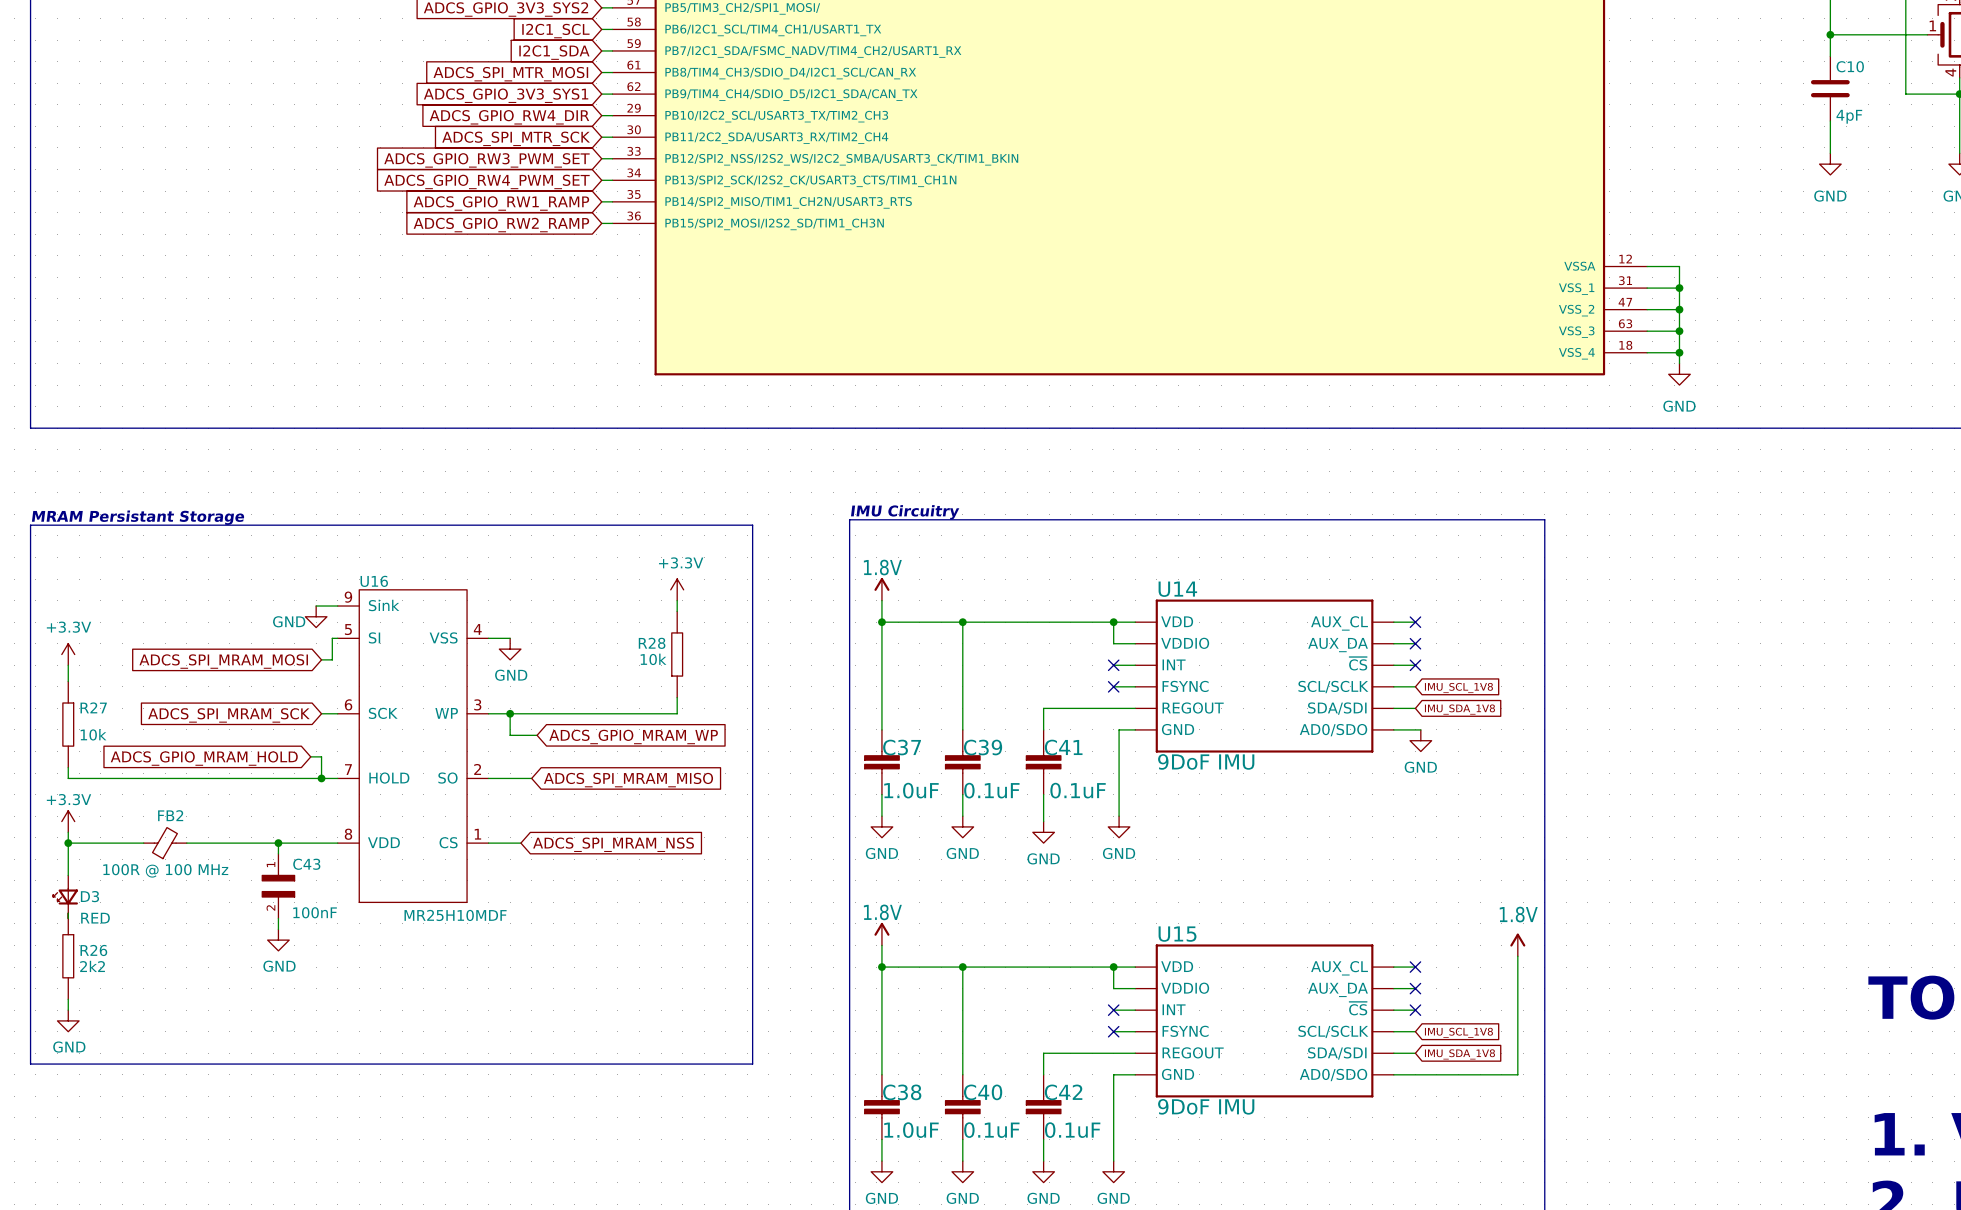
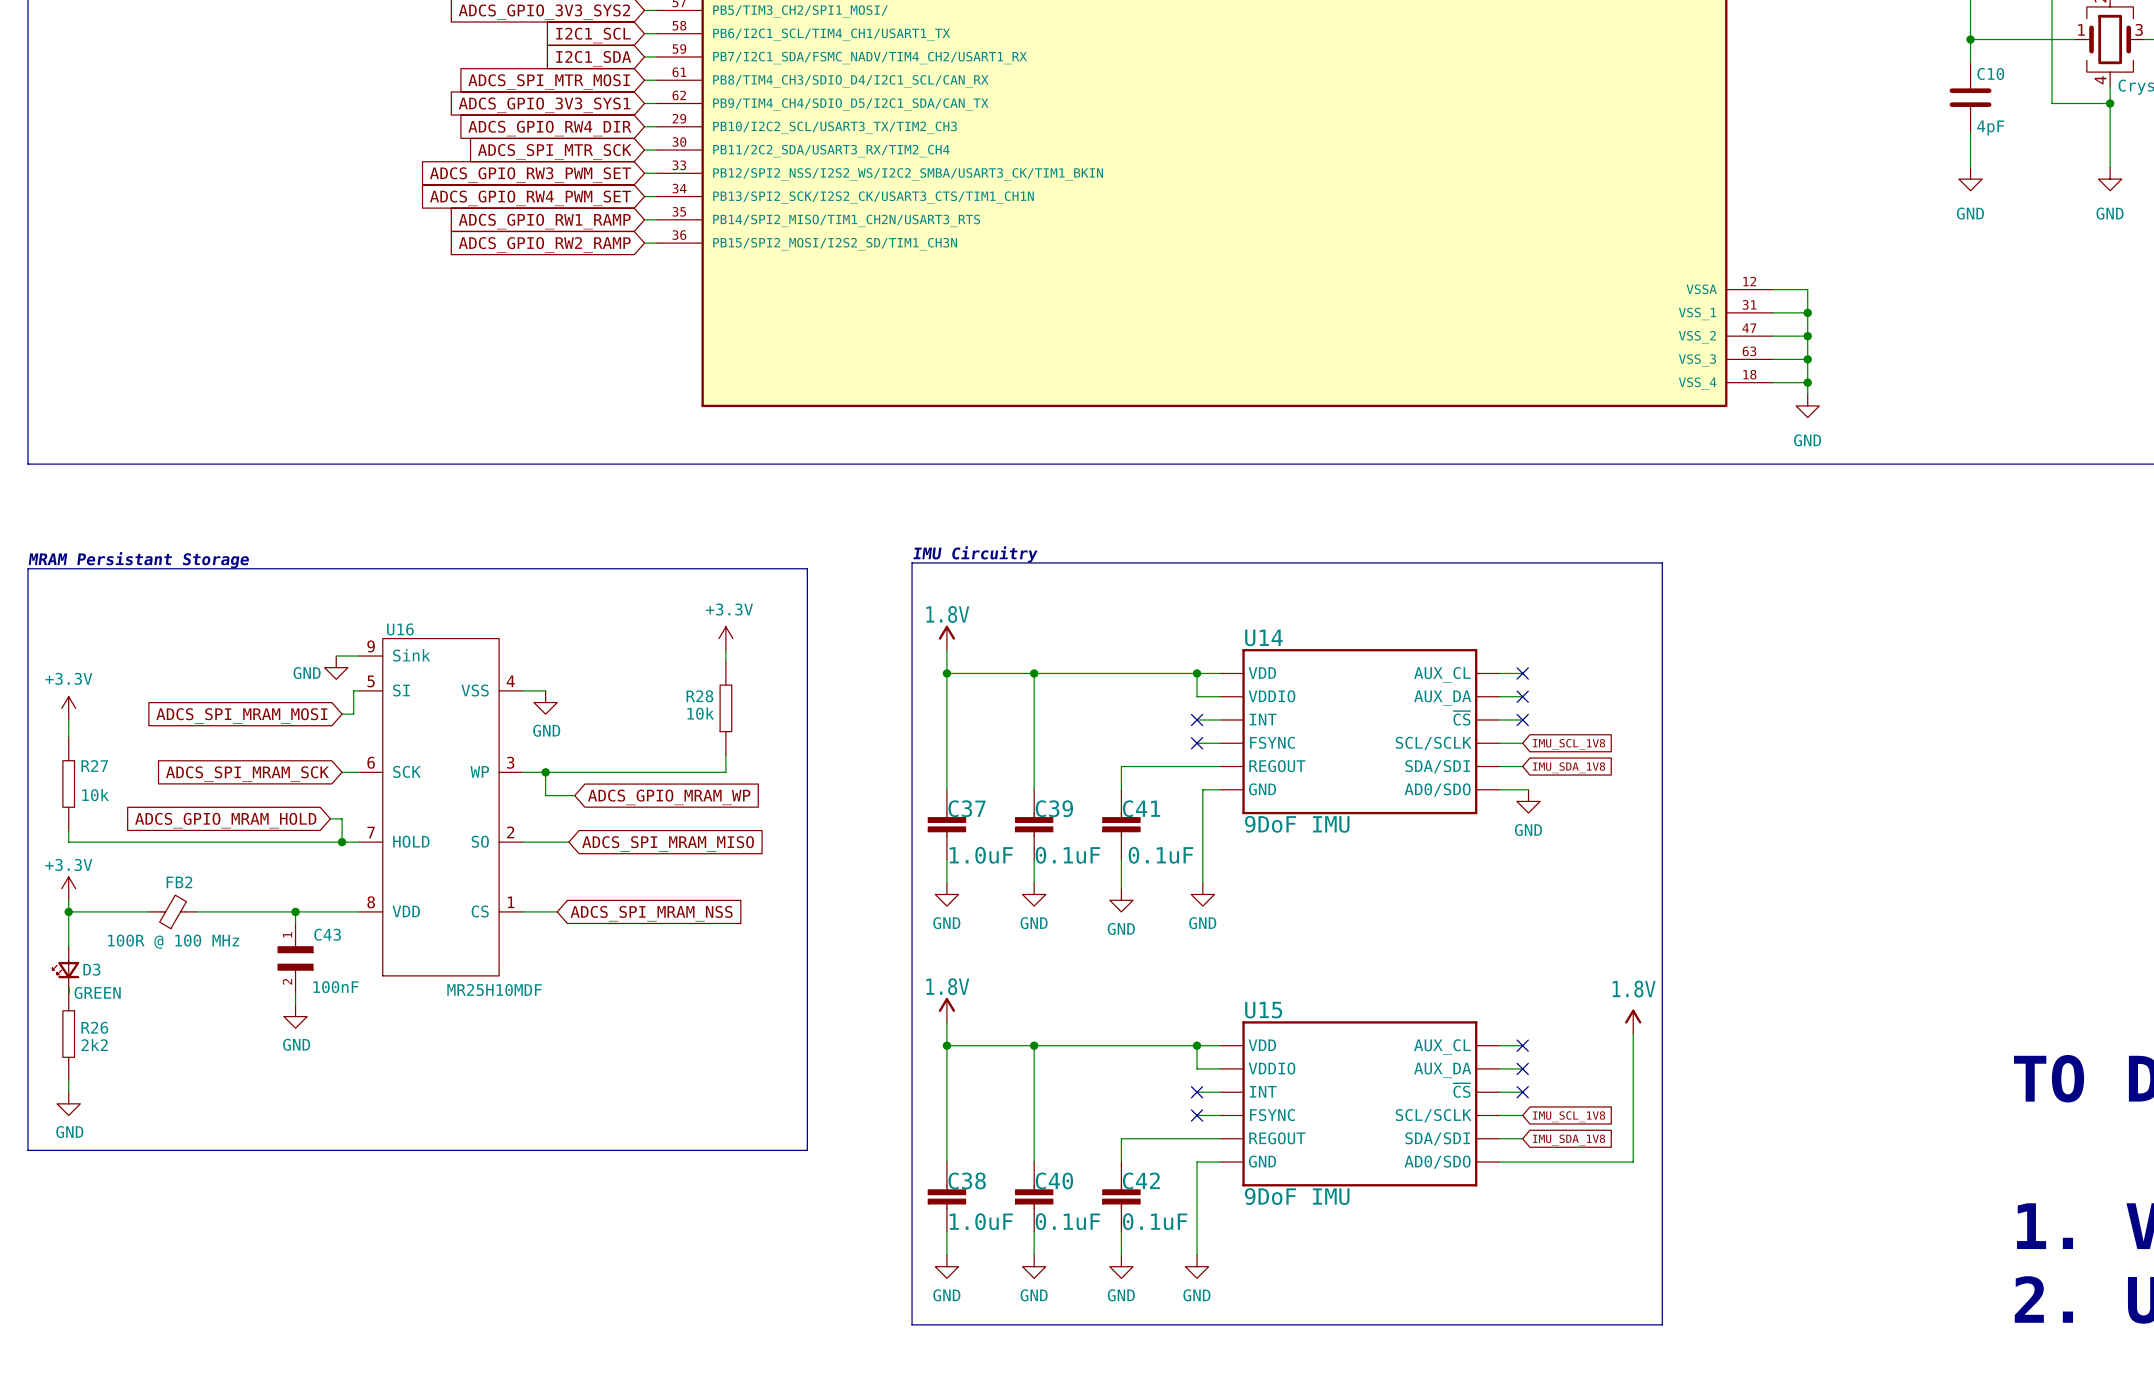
D3 value: RED (95, 918) -> GREEN (97, 992)

